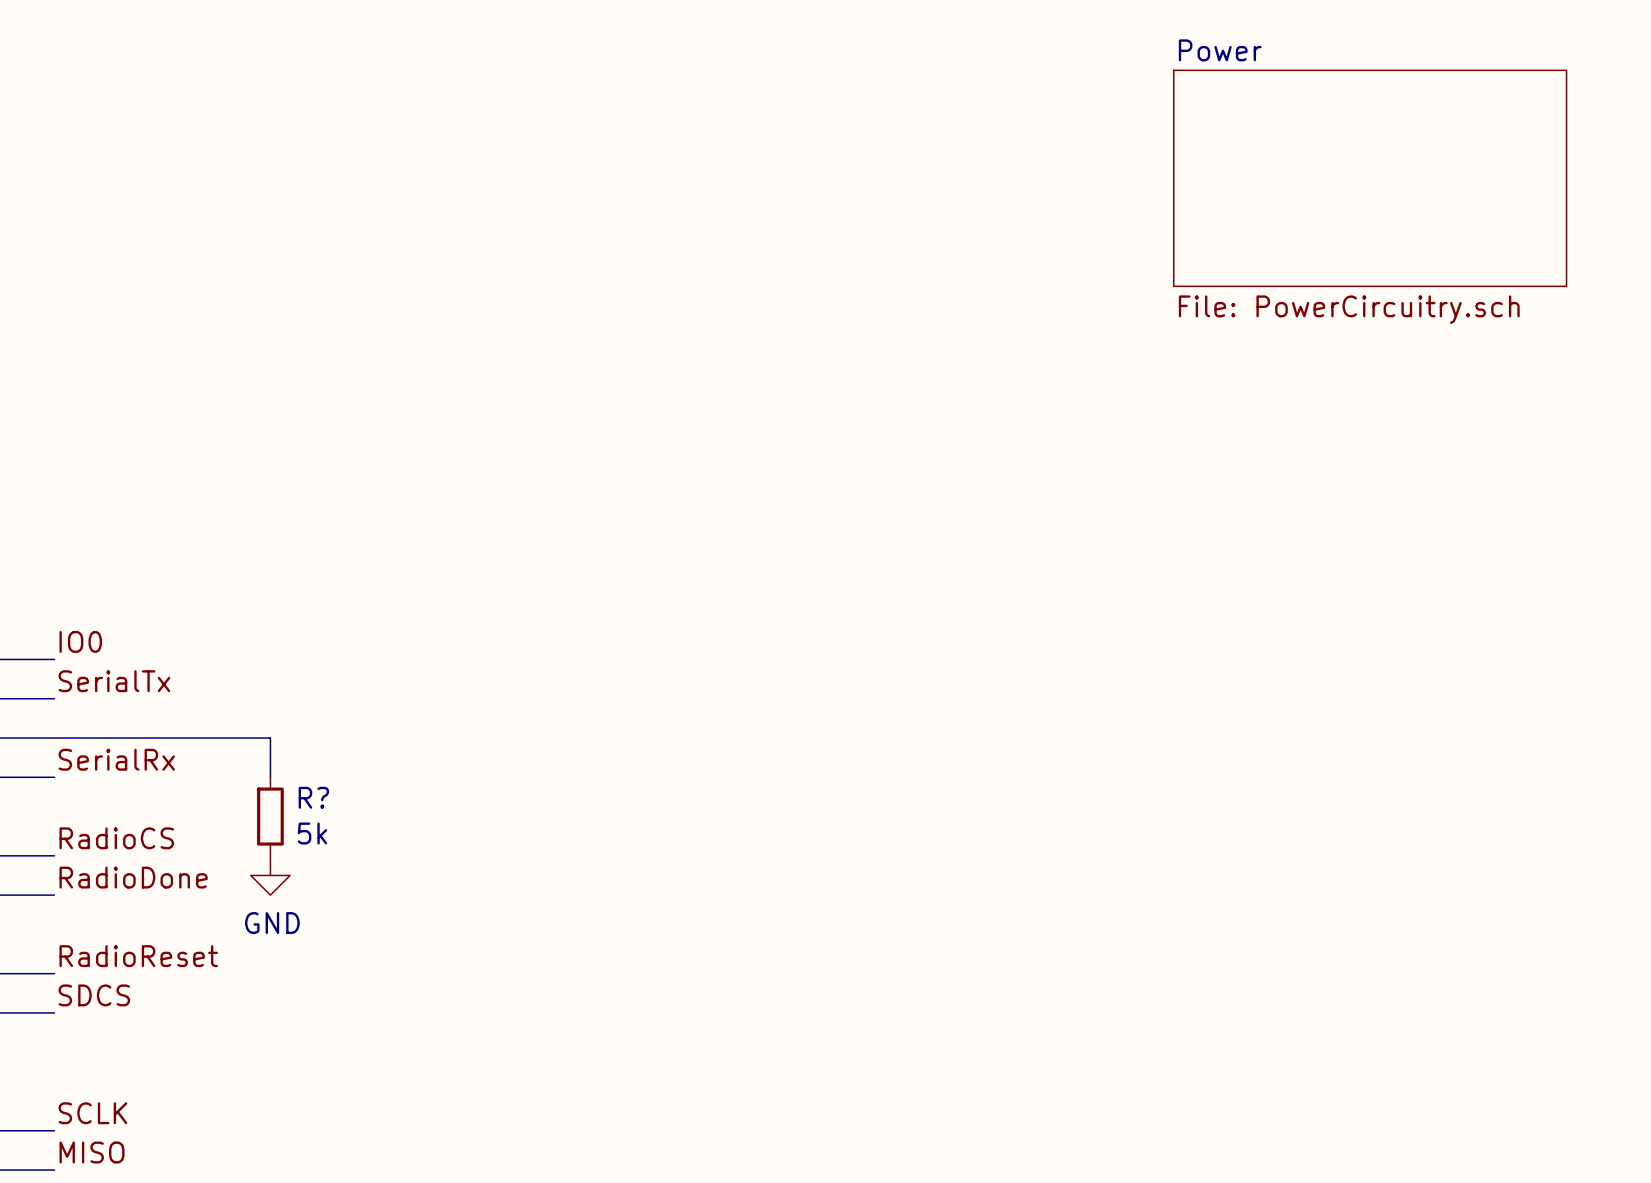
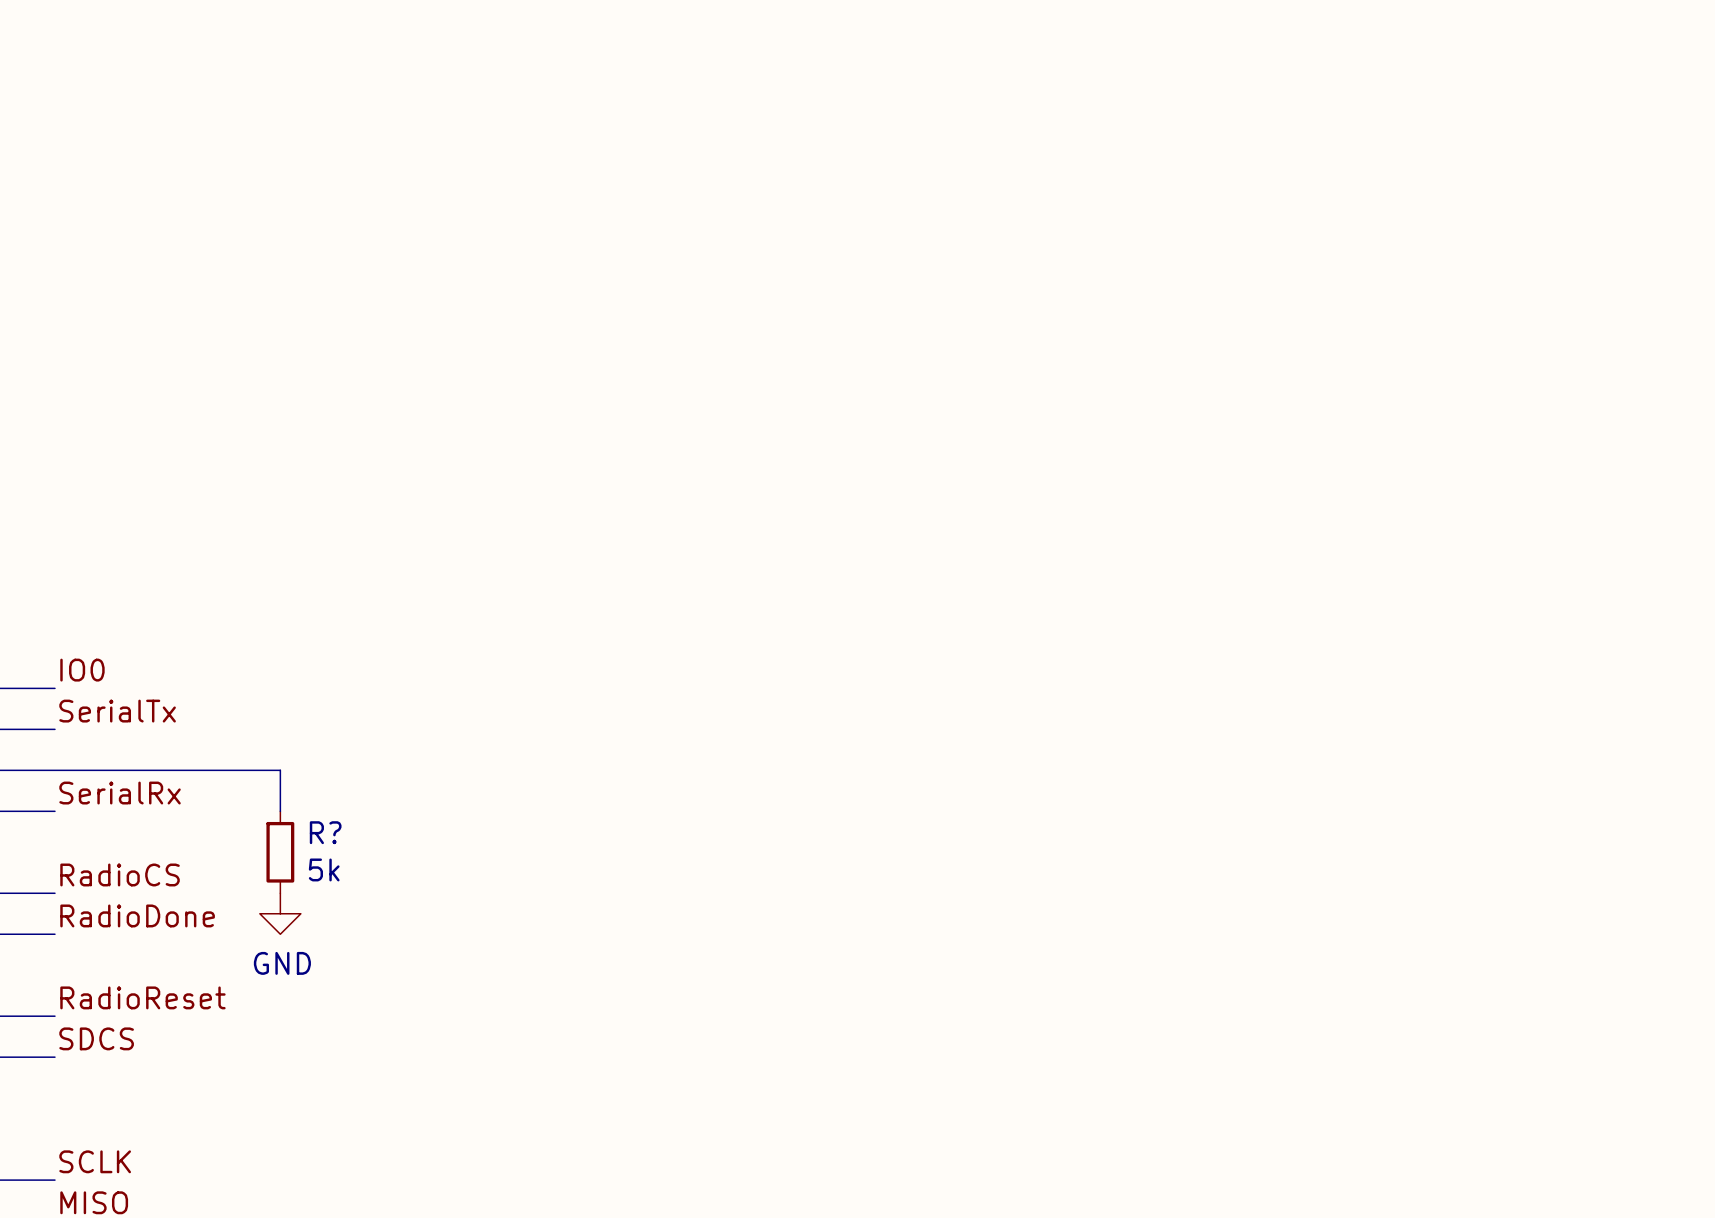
sheet Power: File: PowerCircuitry.sch (1370, 178) -> none

